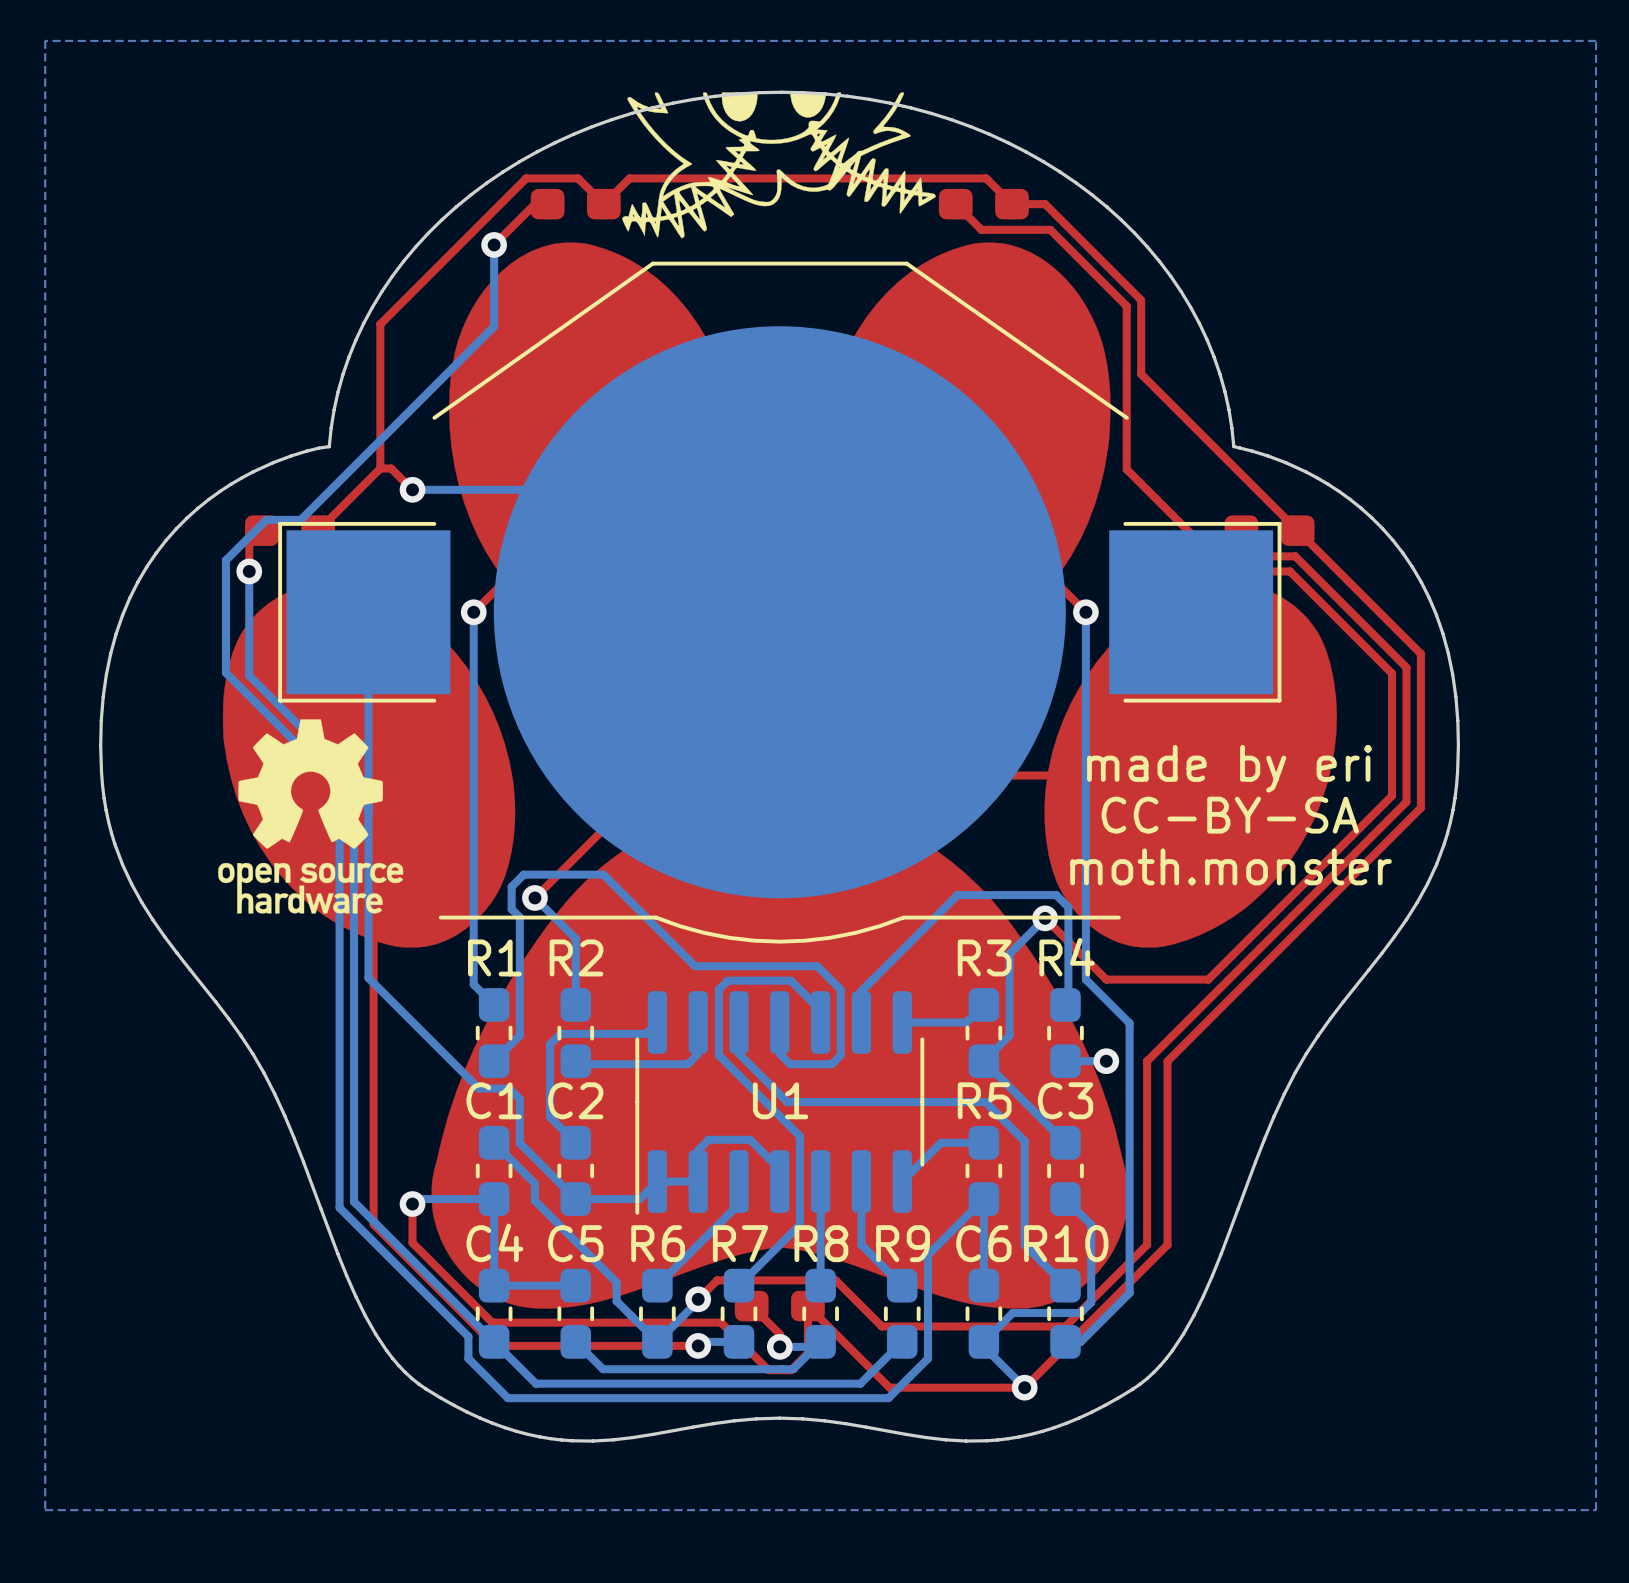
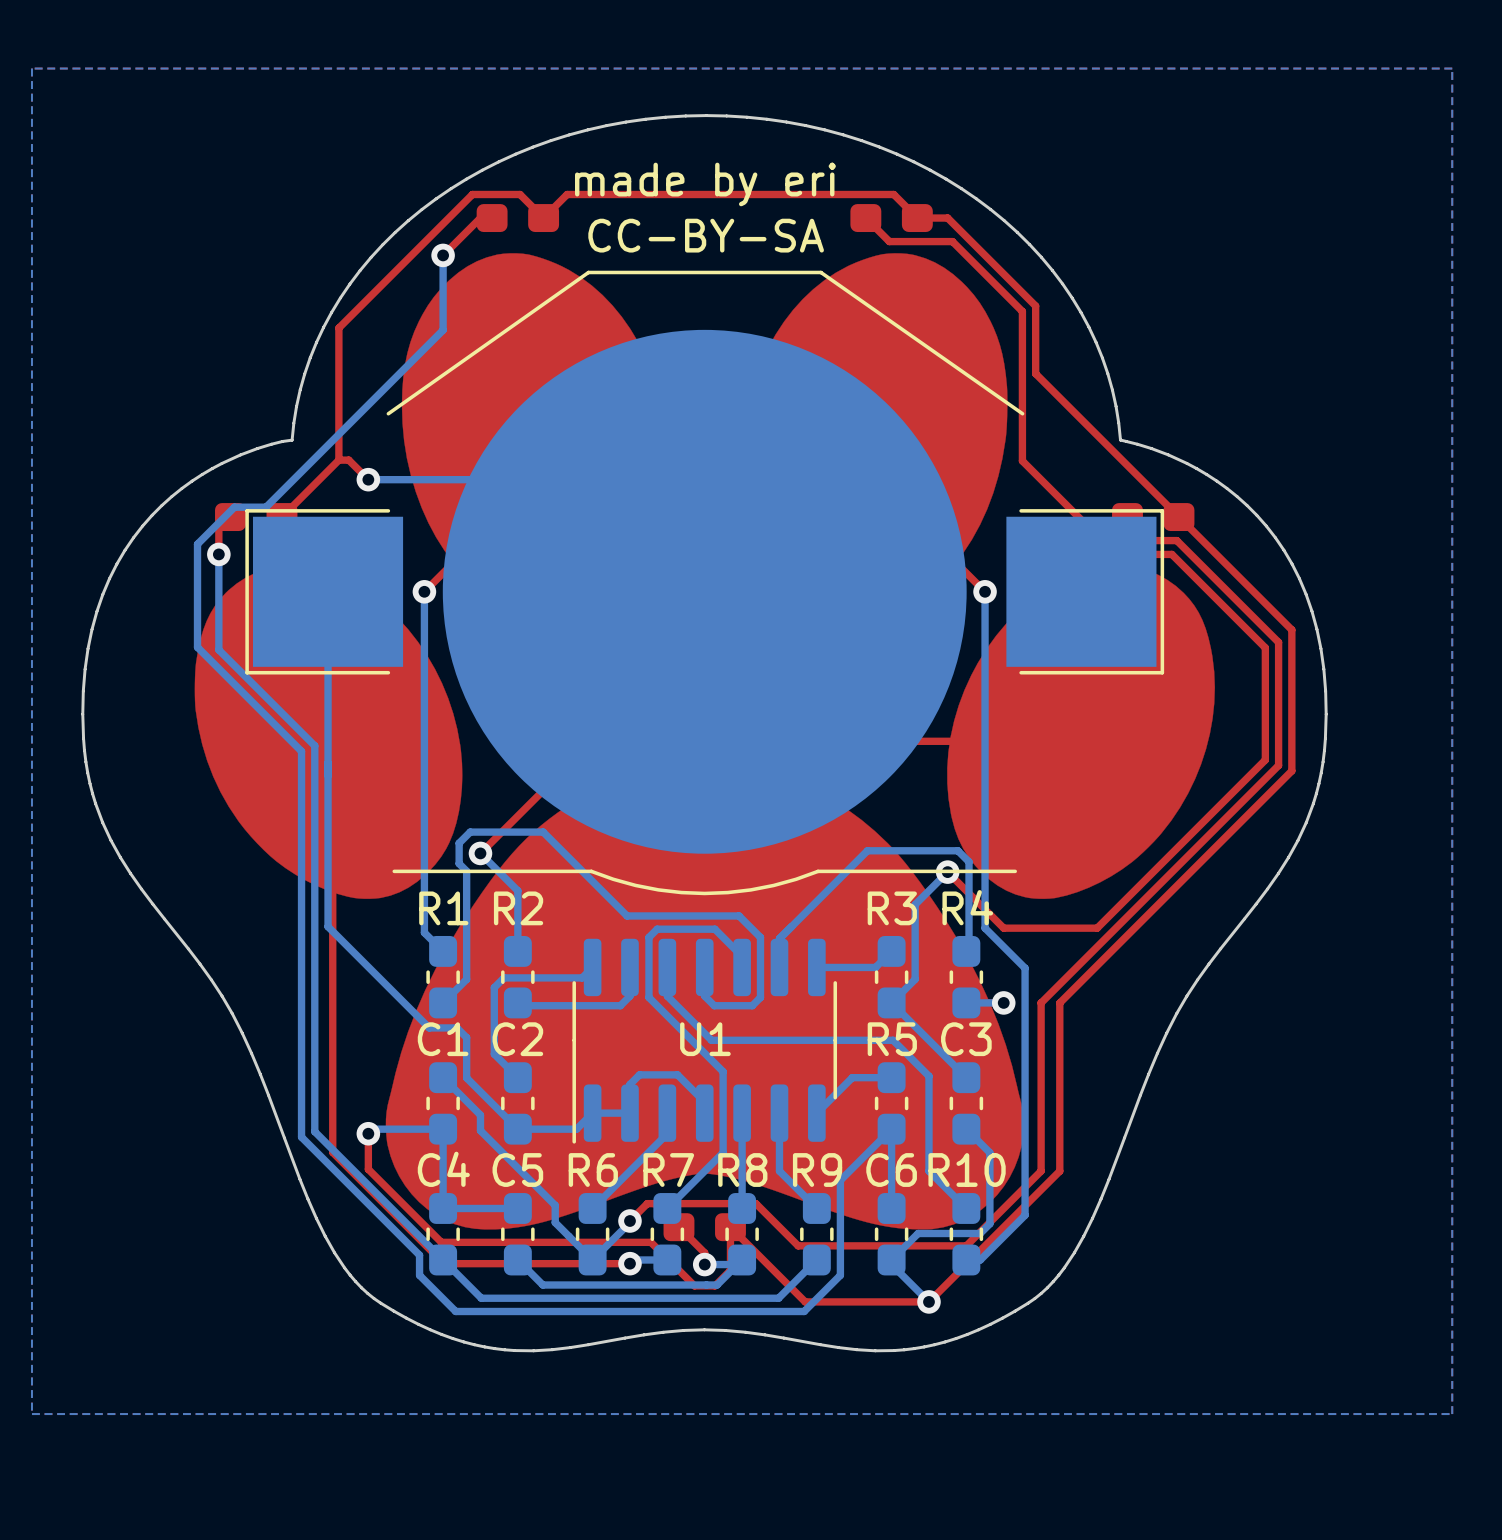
drawing: [622, 92, 936, 239] -> none
drawing: [218, 719, 404, 914] -> none
text position: made by eri (1229, 768) -> made by eri (705, 184)
text position: CC-BY-SA (1230, 815) -> CC-BY-SA (706, 235)
text: moth.monster (1231, 866) -> none

